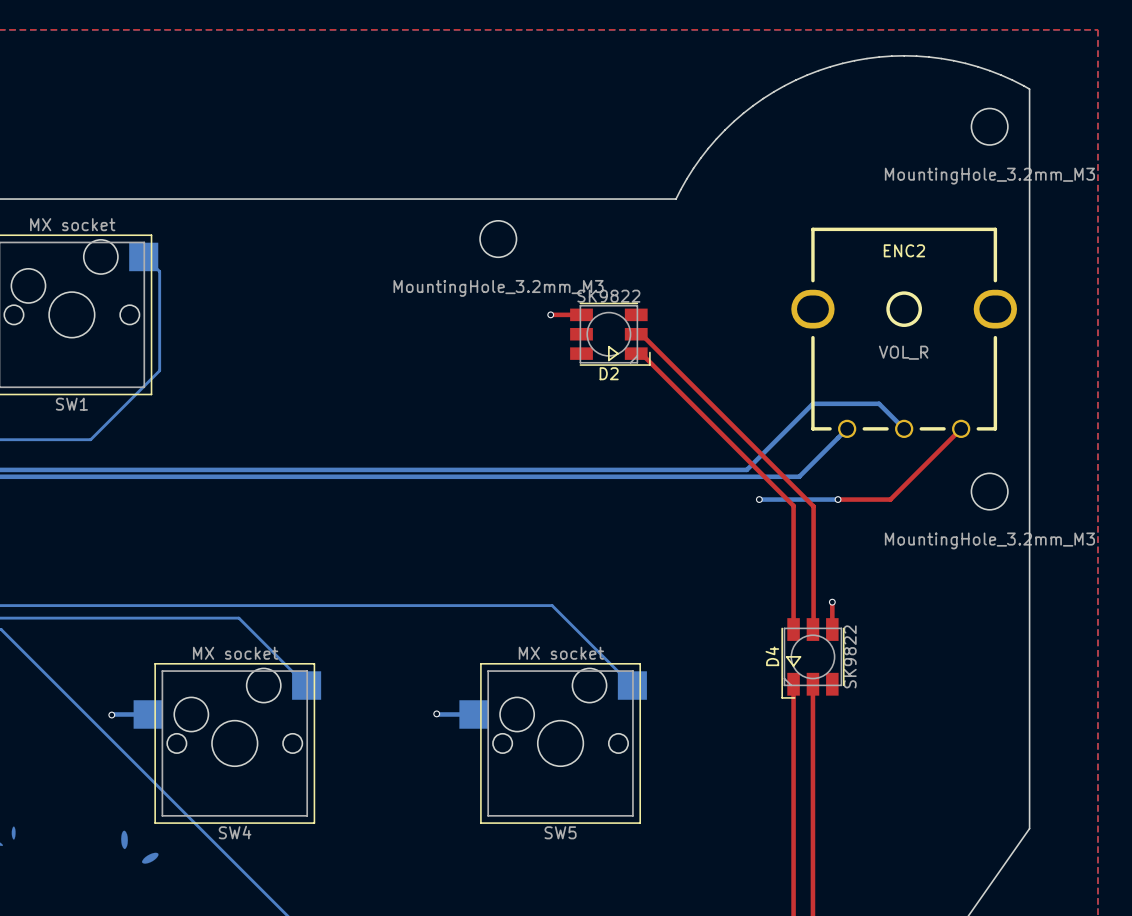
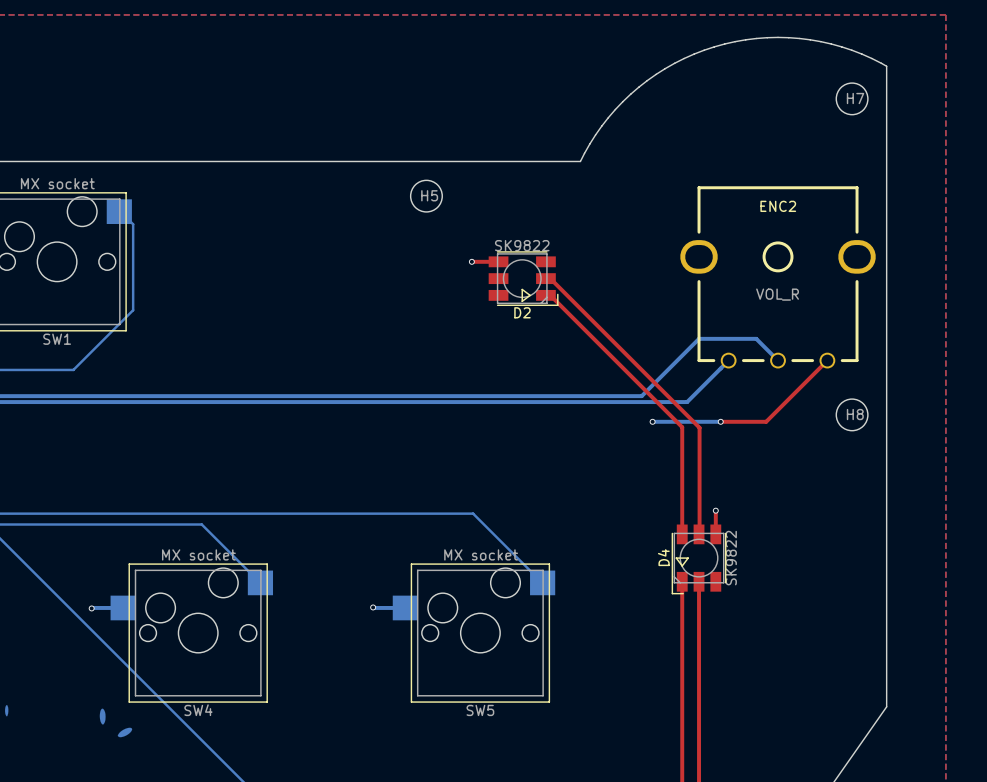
H7 name: none -> H7 (855, 98)
H7 value: MountingHole_3.2mm_M3 (989, 176) -> none
H5 name: none -> H5 (429, 195)
H5 value: MountingHole_3.2mm_M3 (498, 288) -> none
H8 name: none -> H8 (855, 414)
H8 value: MountingHole_3.2mm_M3 (989, 540) -> none

